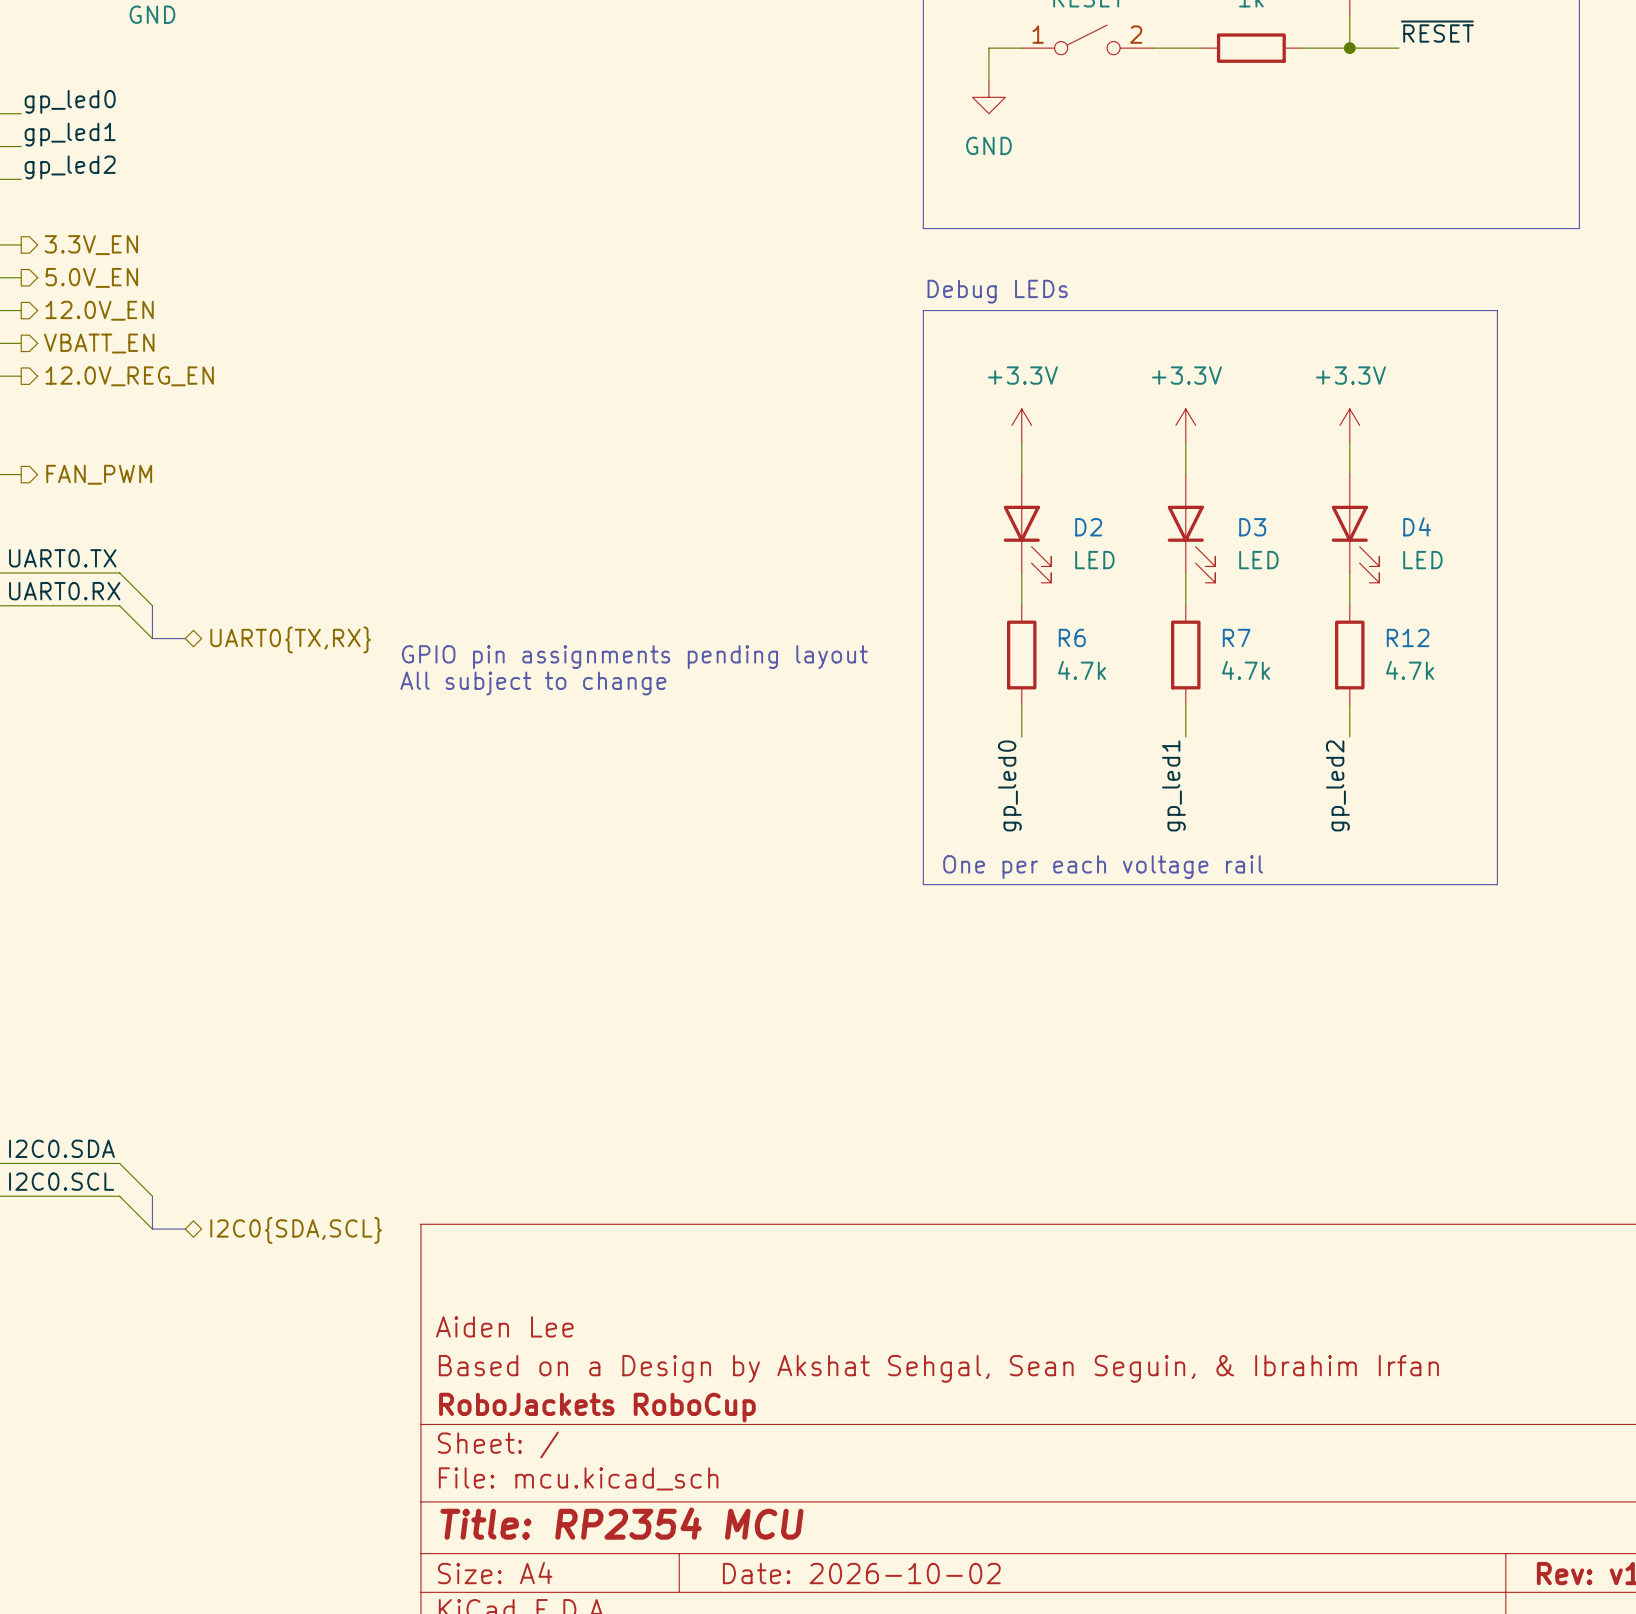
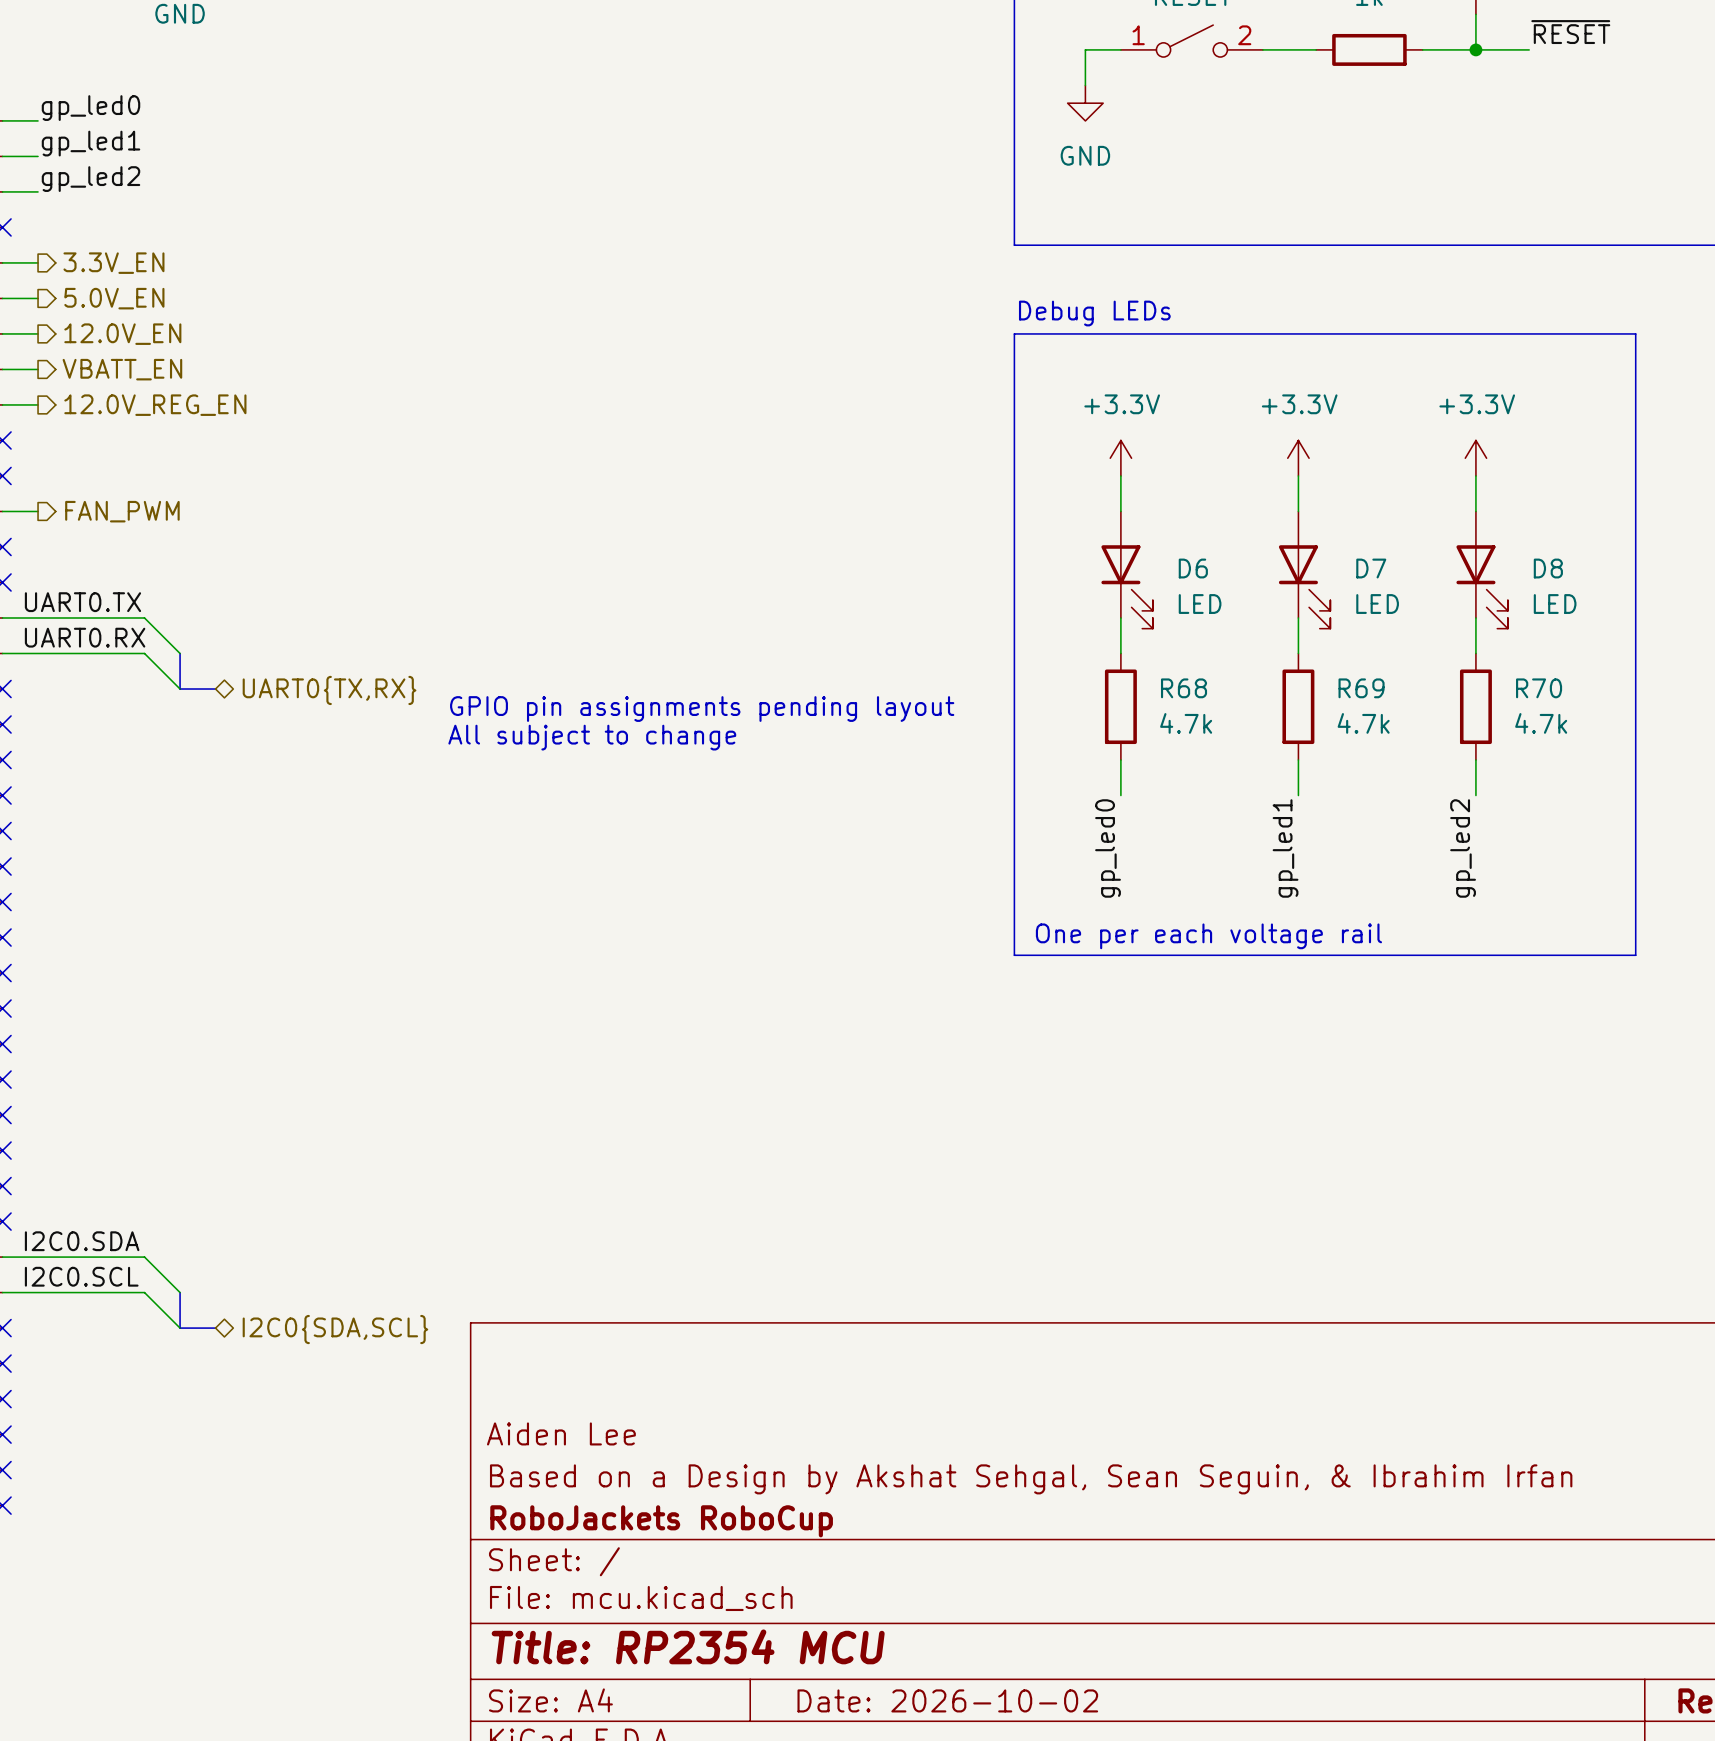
D4 name: D4 (1417, 526) -> D8 (1548, 568)
D2 name: D2 (1088, 527) -> D6 (1193, 568)
D3 name: D3 (1252, 527) -> D7 (1371, 568)
R6 name: R6 (1072, 637) -> R68 (1184, 688)
R7 name: R7 (1236, 637) -> R69 (1361, 688)
R12 name: R12 (1408, 637) -> R70 (1539, 688)

